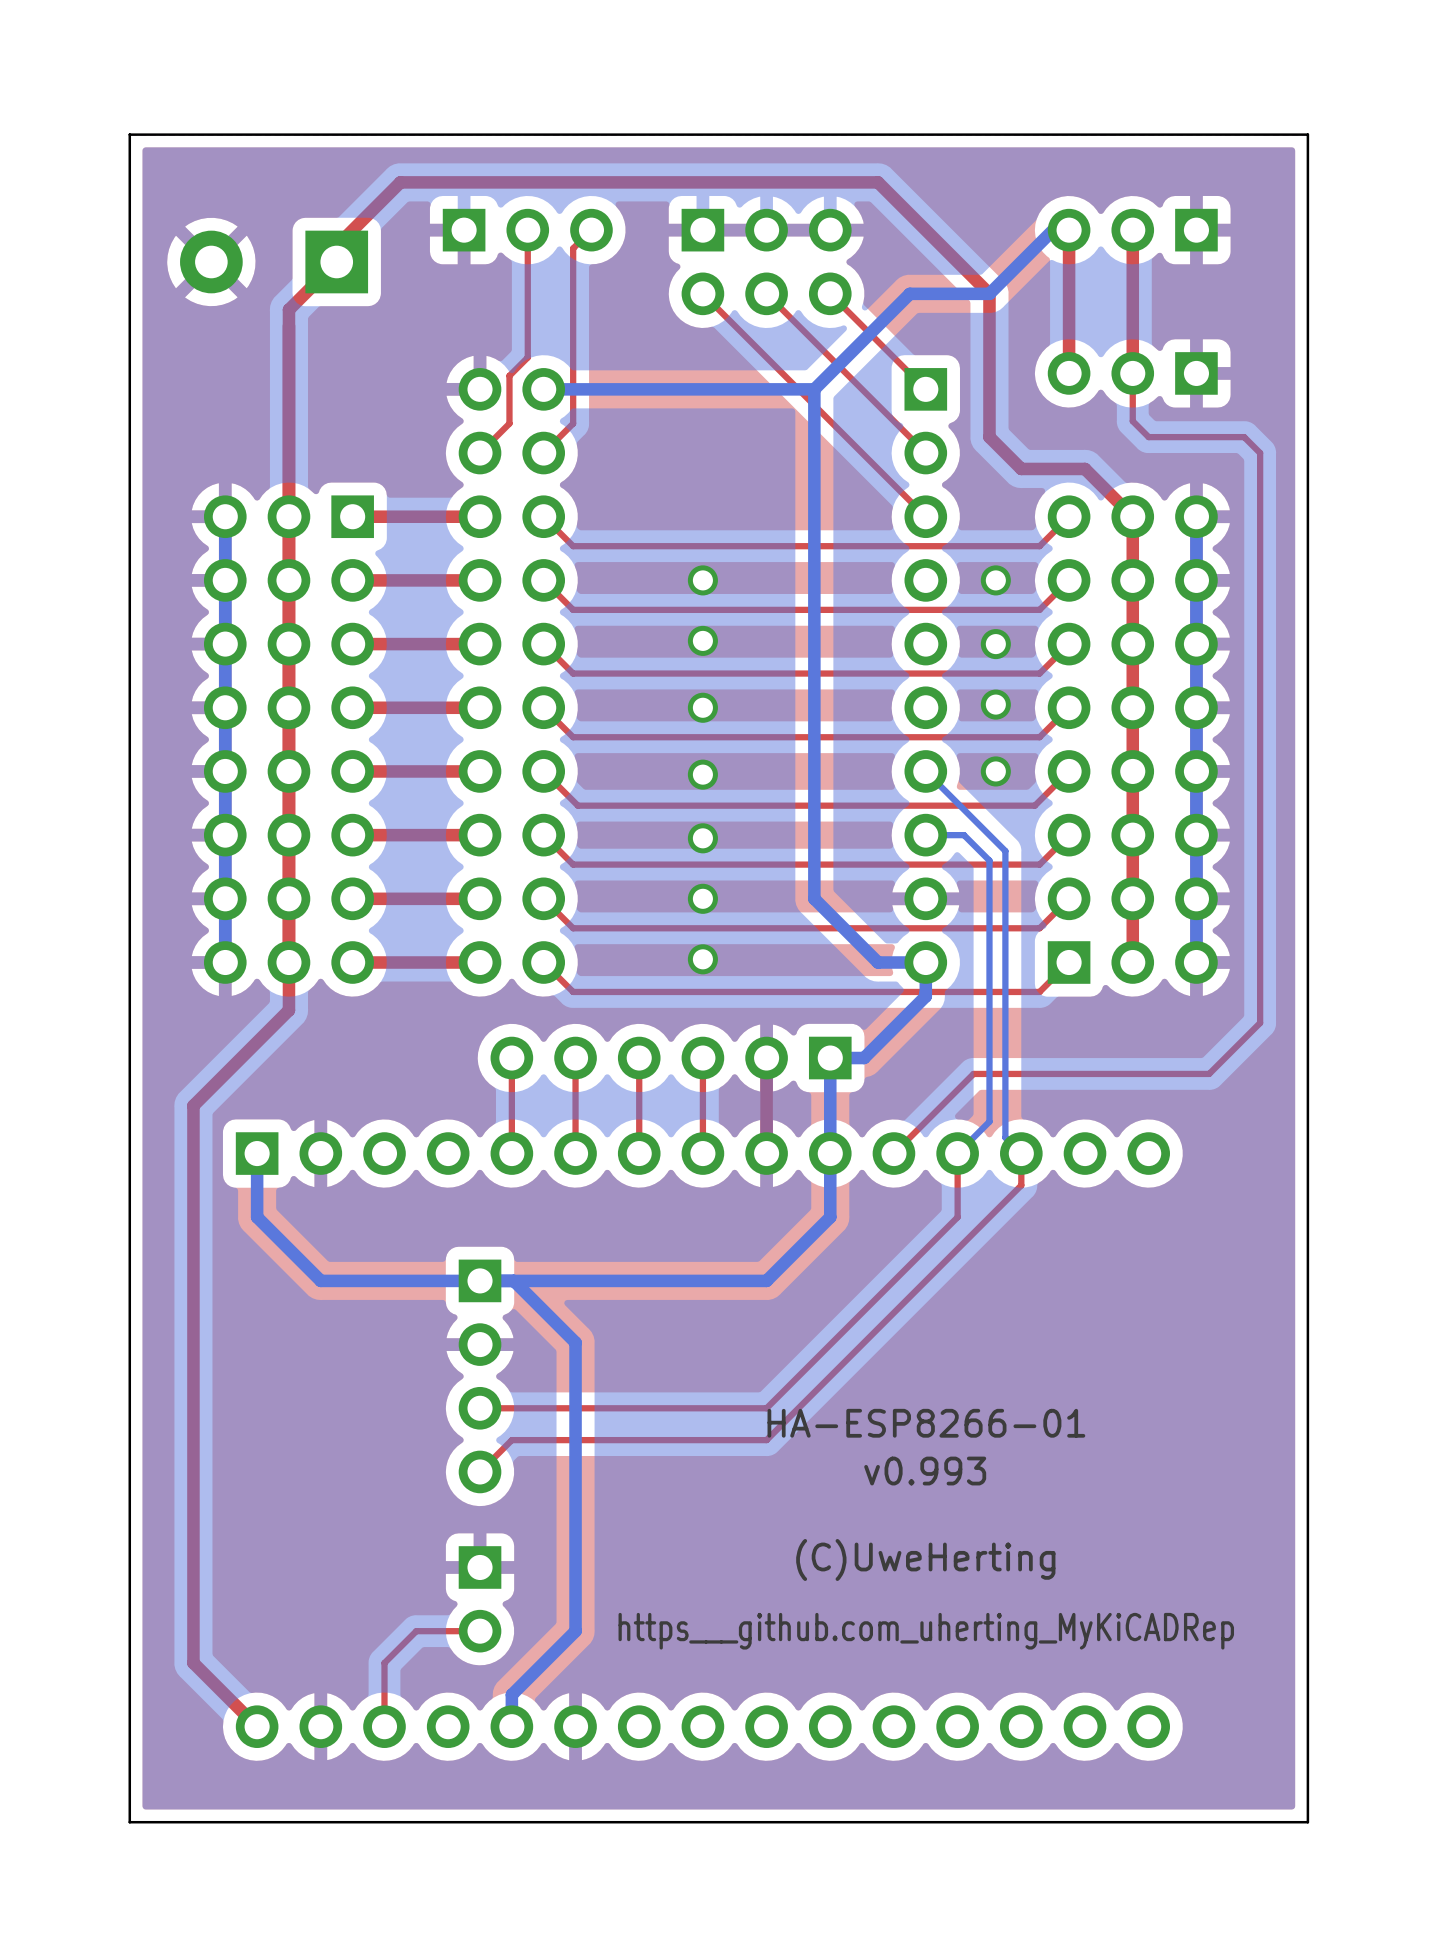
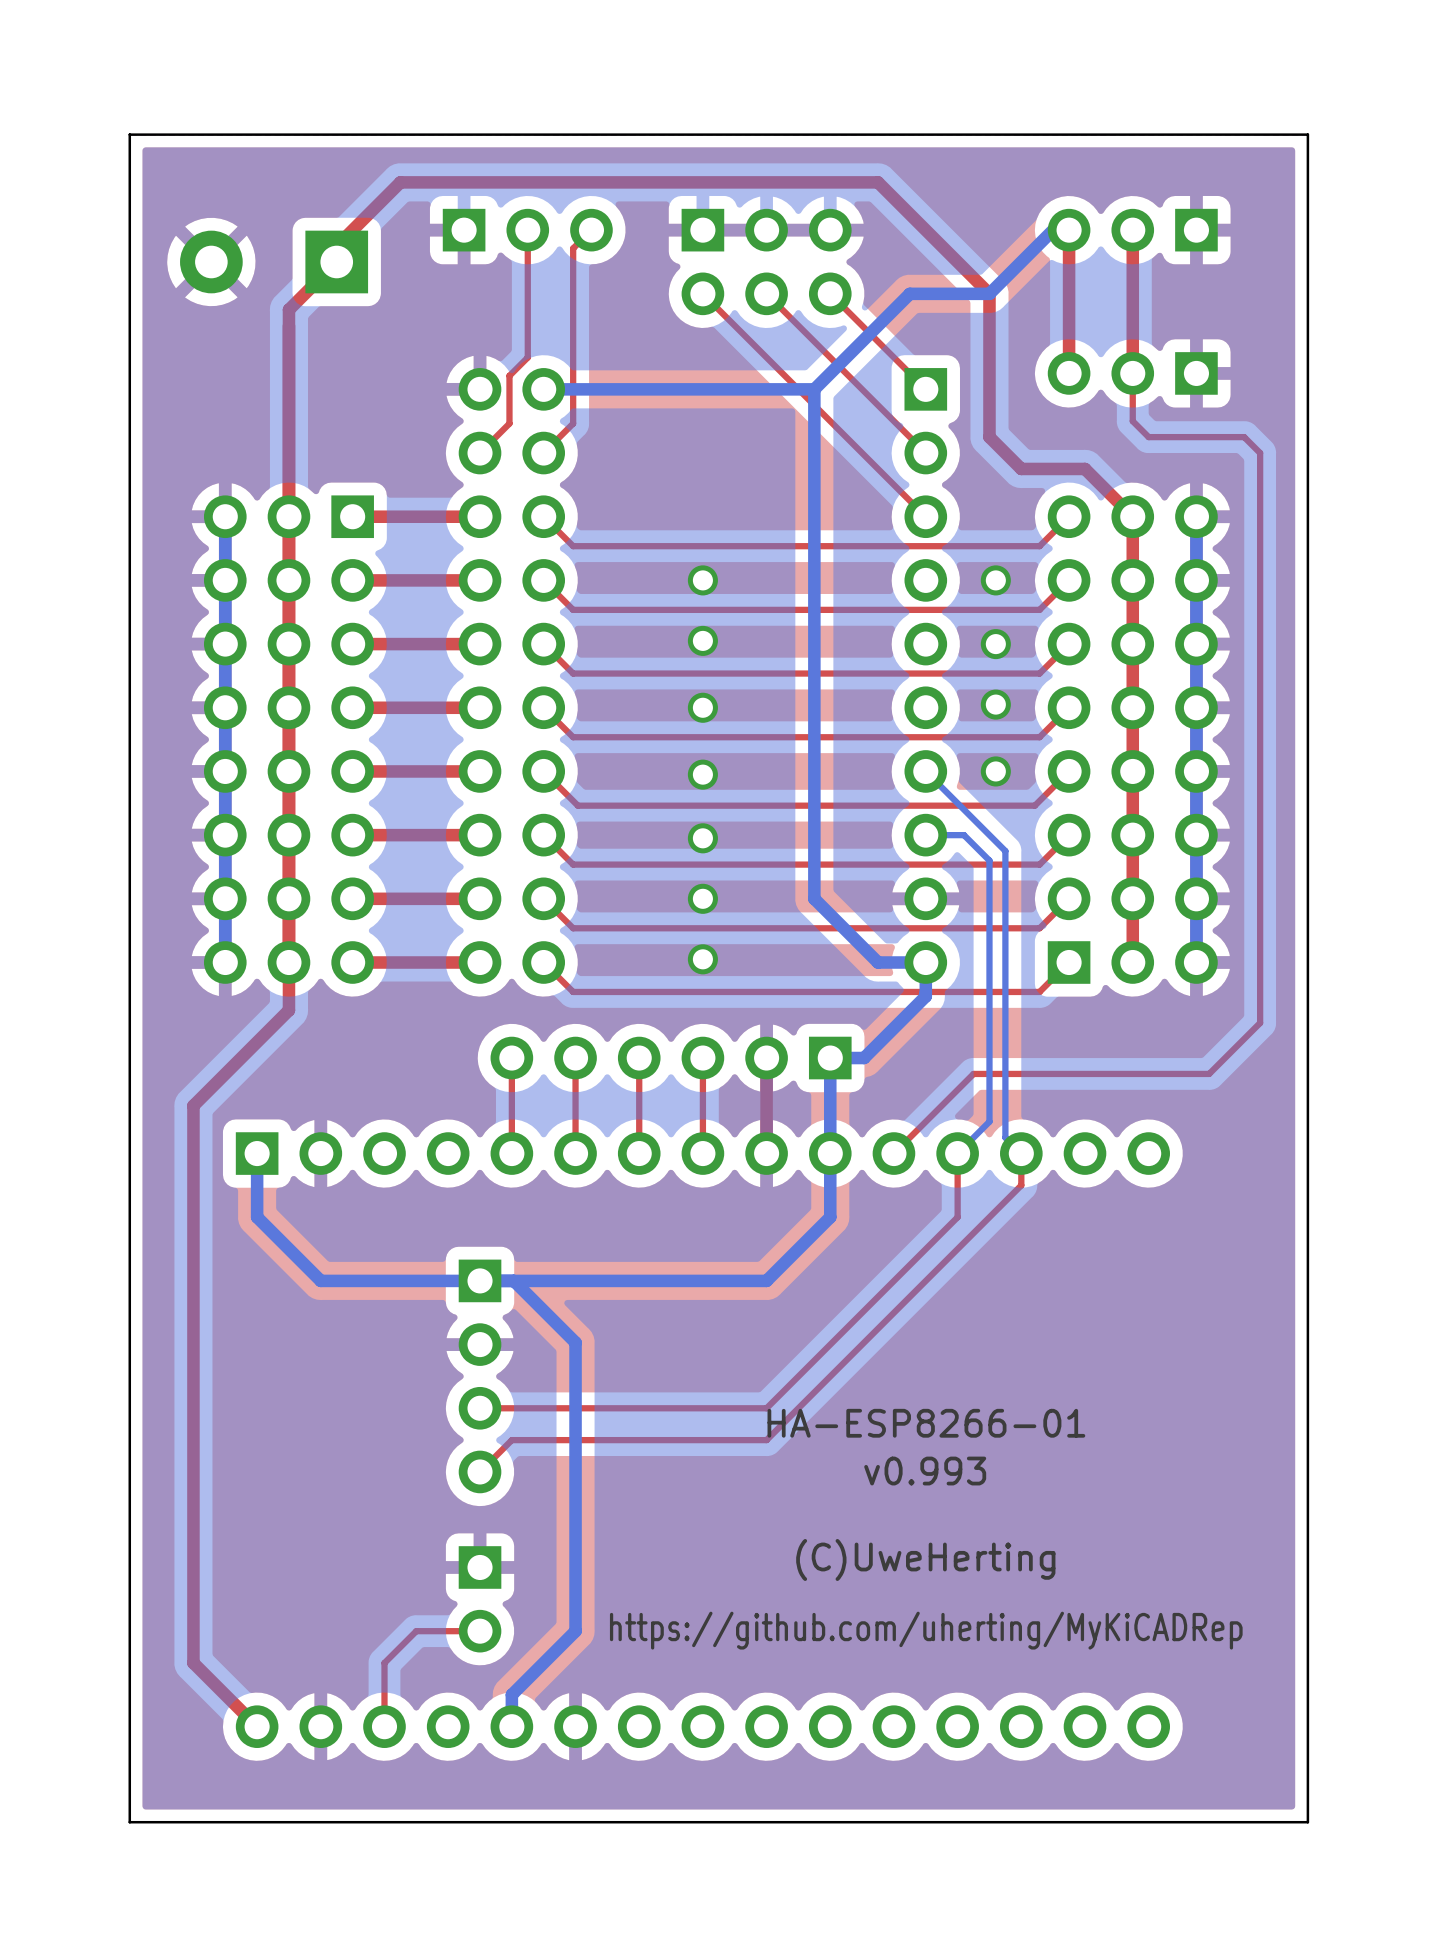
drawing shape: [618, 1612, 1235, 1650] -> [609, 1611, 1243, 1650]

